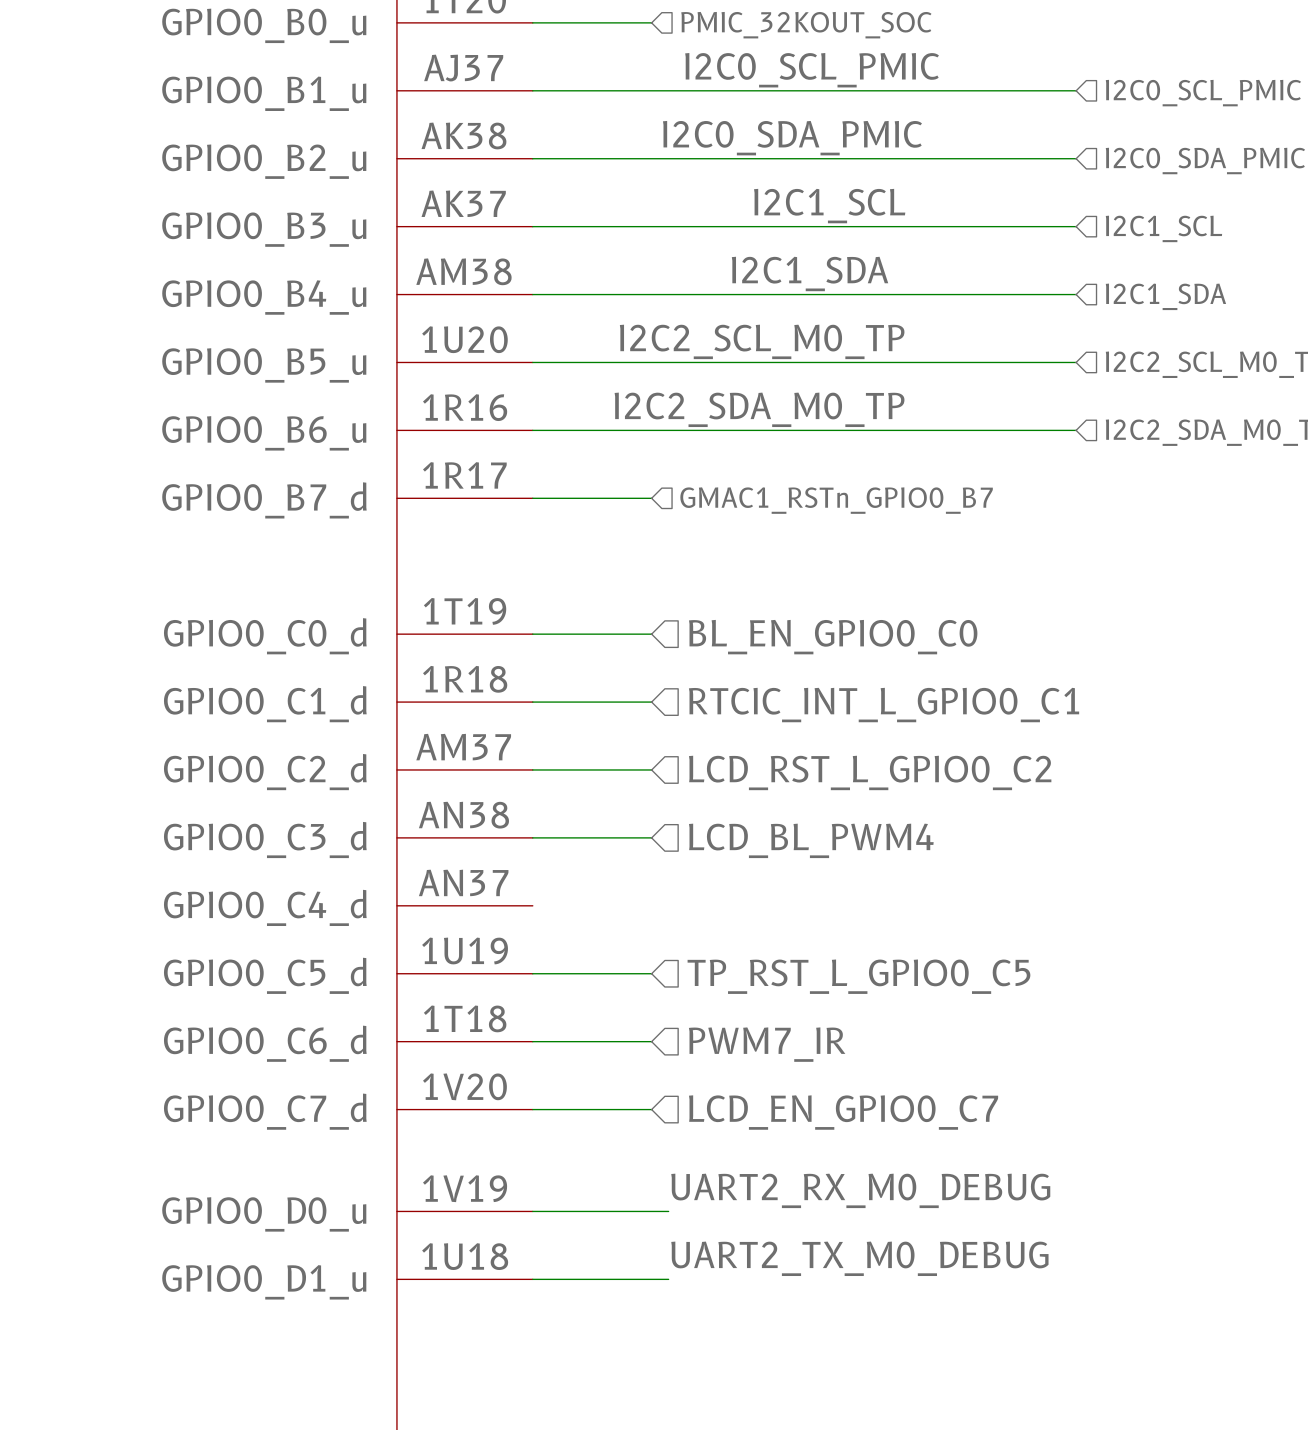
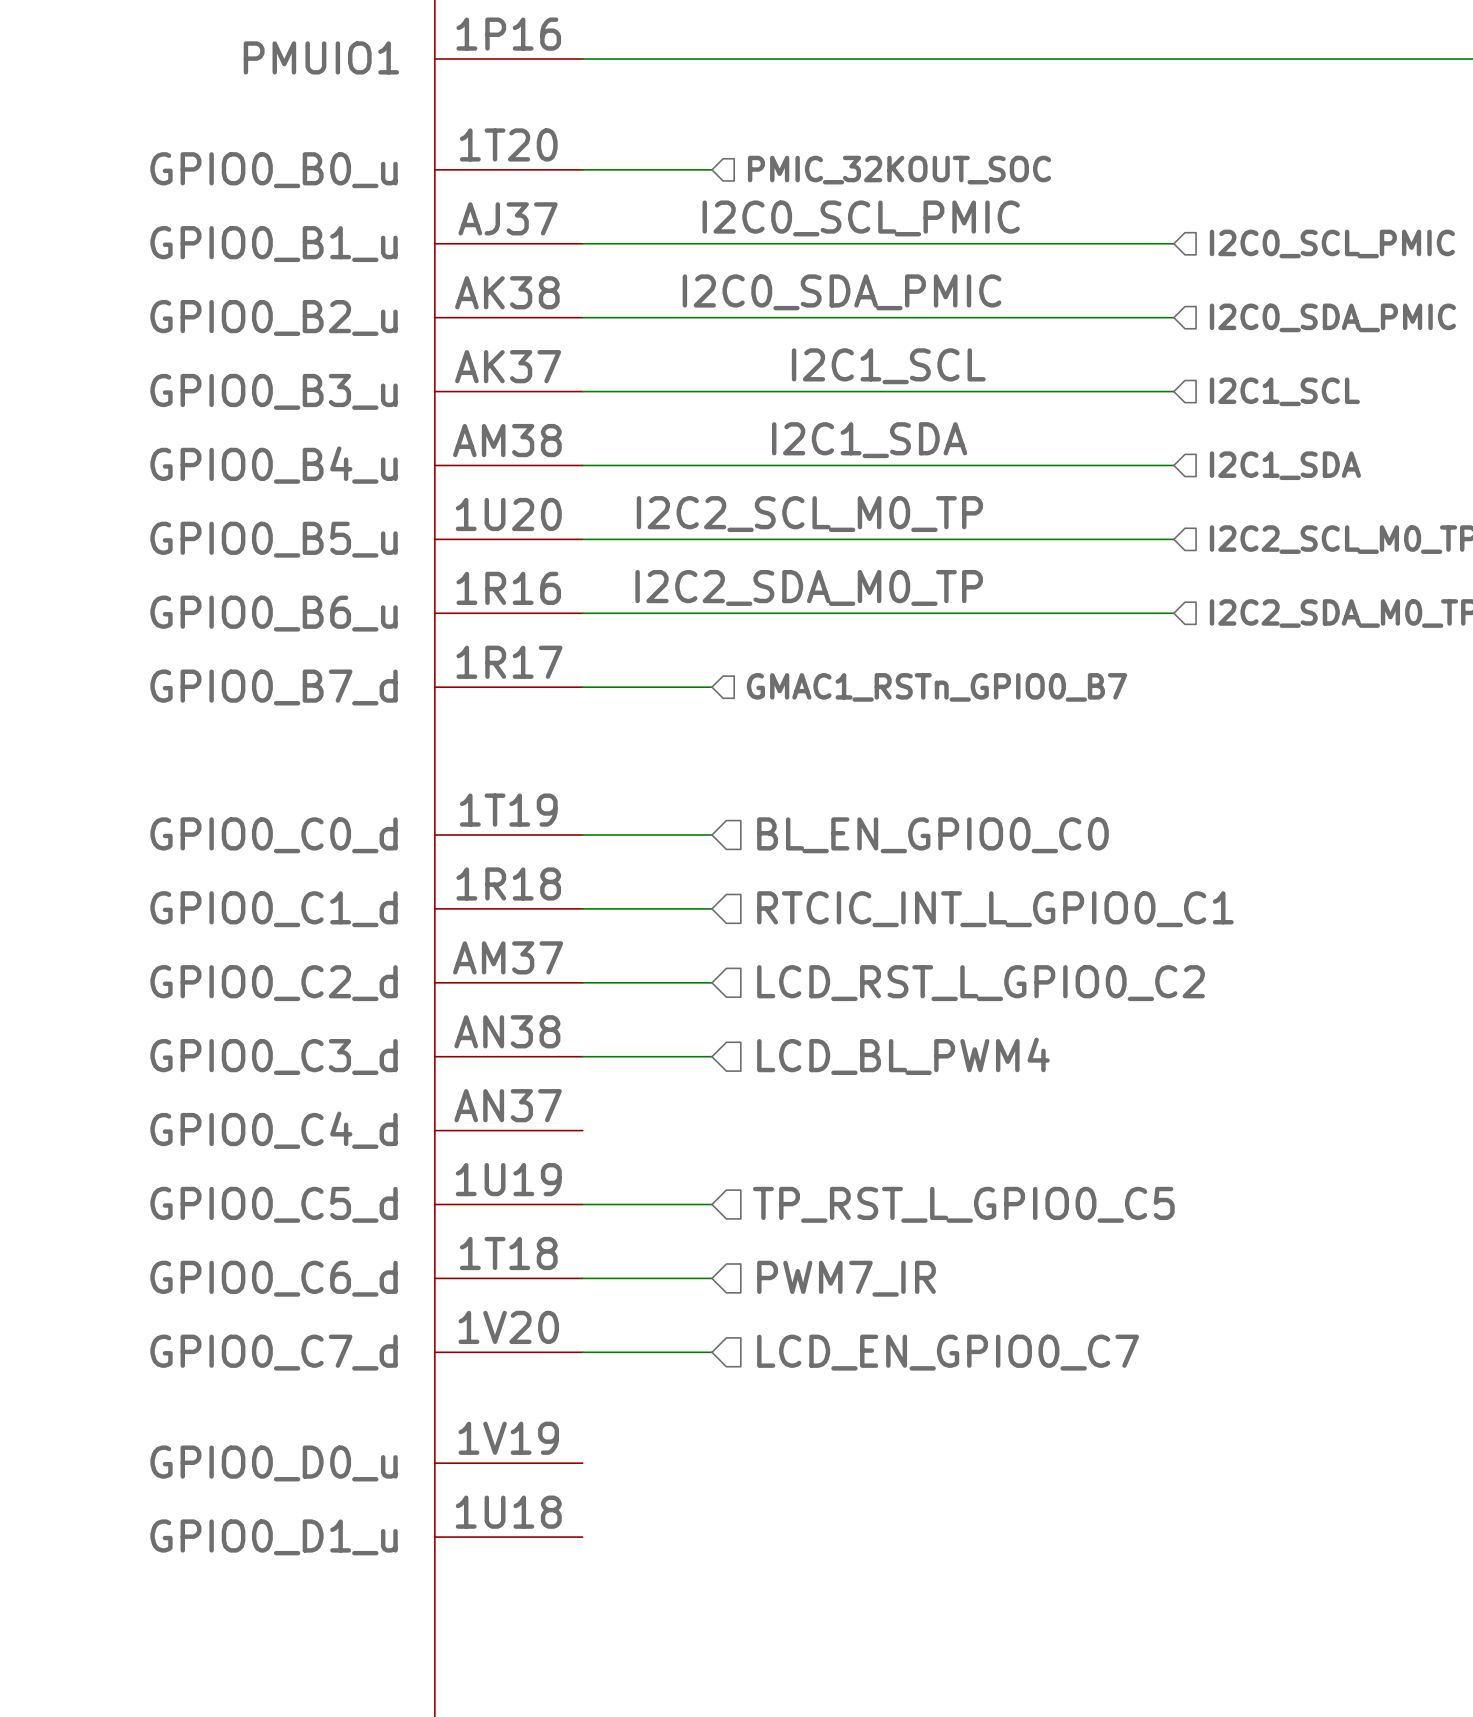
label: UART2_RX_M0_DEBUG (860, 1190) -> none
wire: (532, 1211) (668, 1211) -> none
label: UART2_TX_M0_DEBUG (859, 1258) -> none
wire: (532, 1279) (668, 1279) -> none

